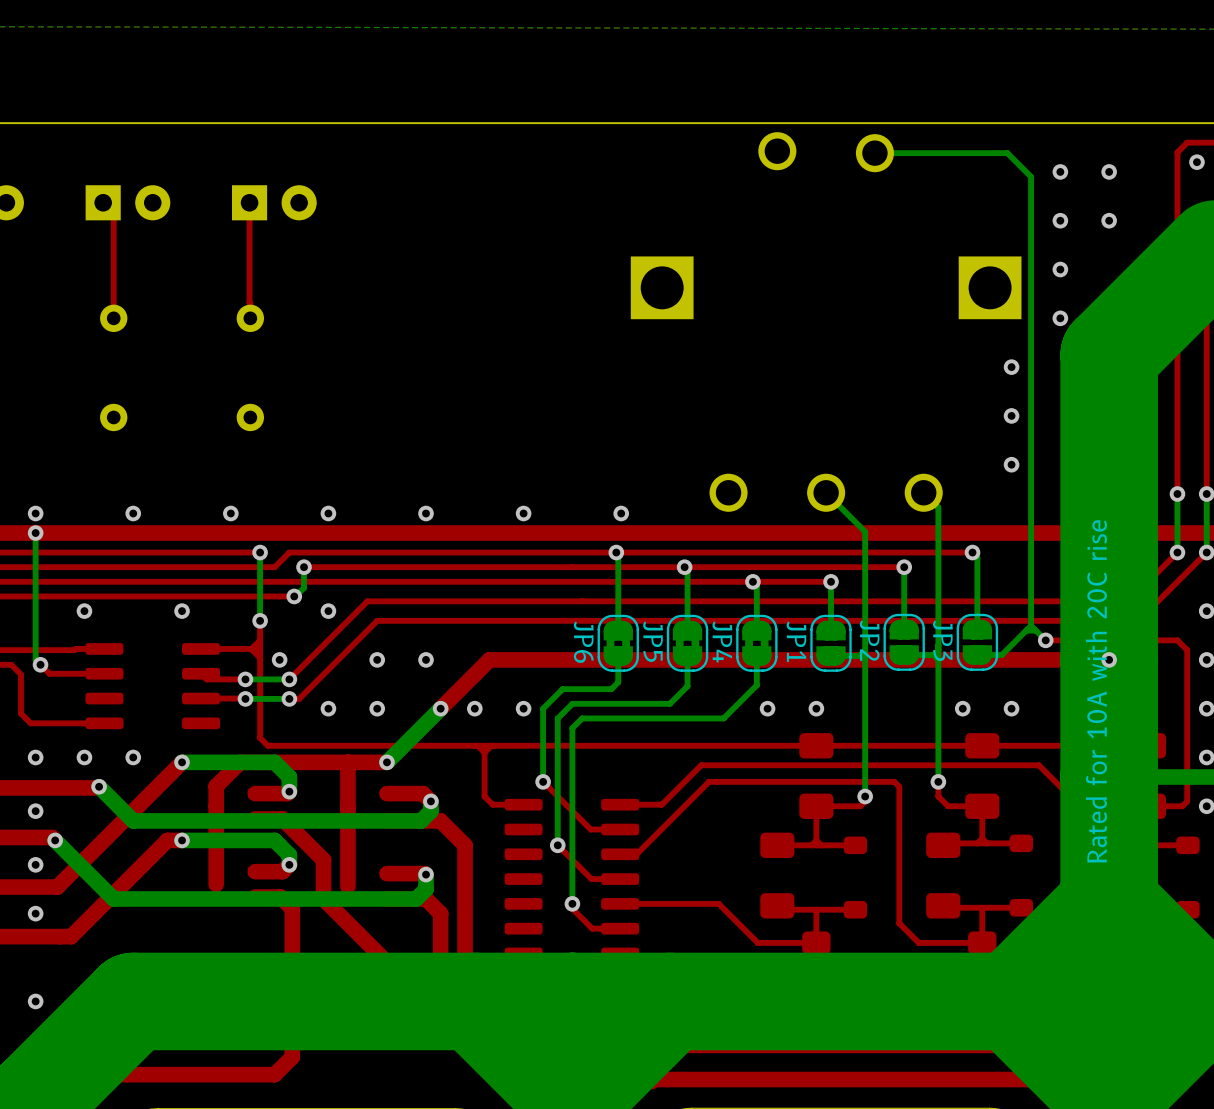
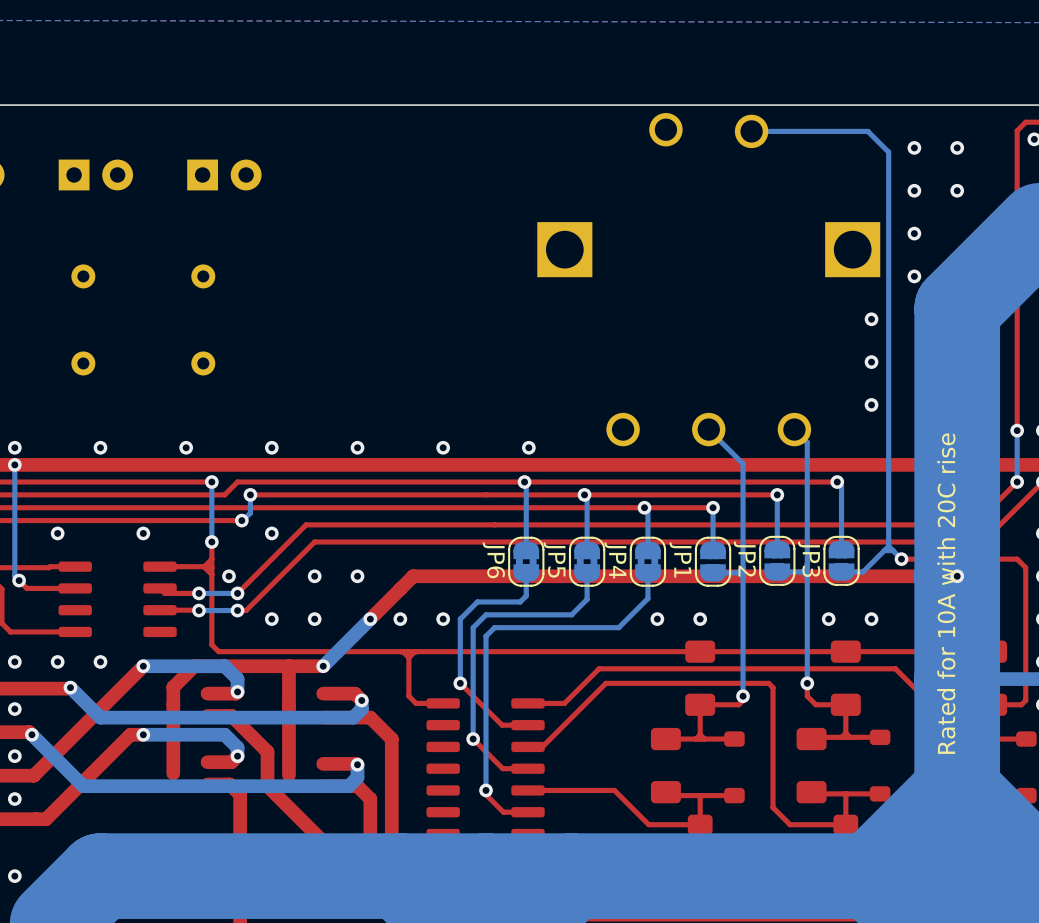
top track: (103, 202) (113, 213) (113, 318) -> none
top track: (249, 202) (250, 318) -> none

